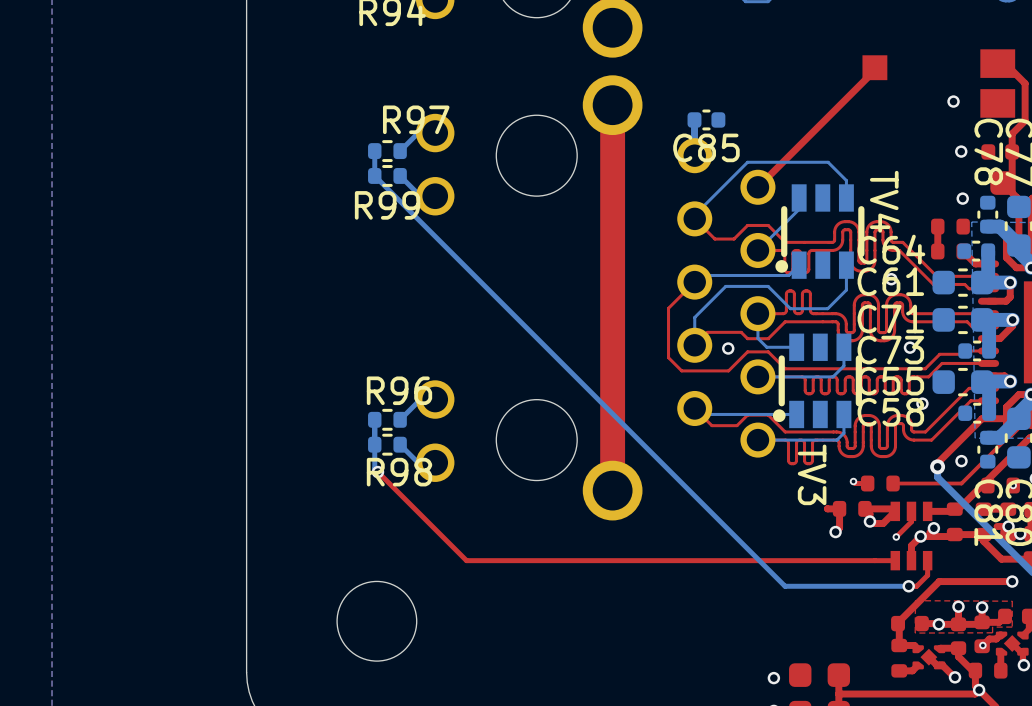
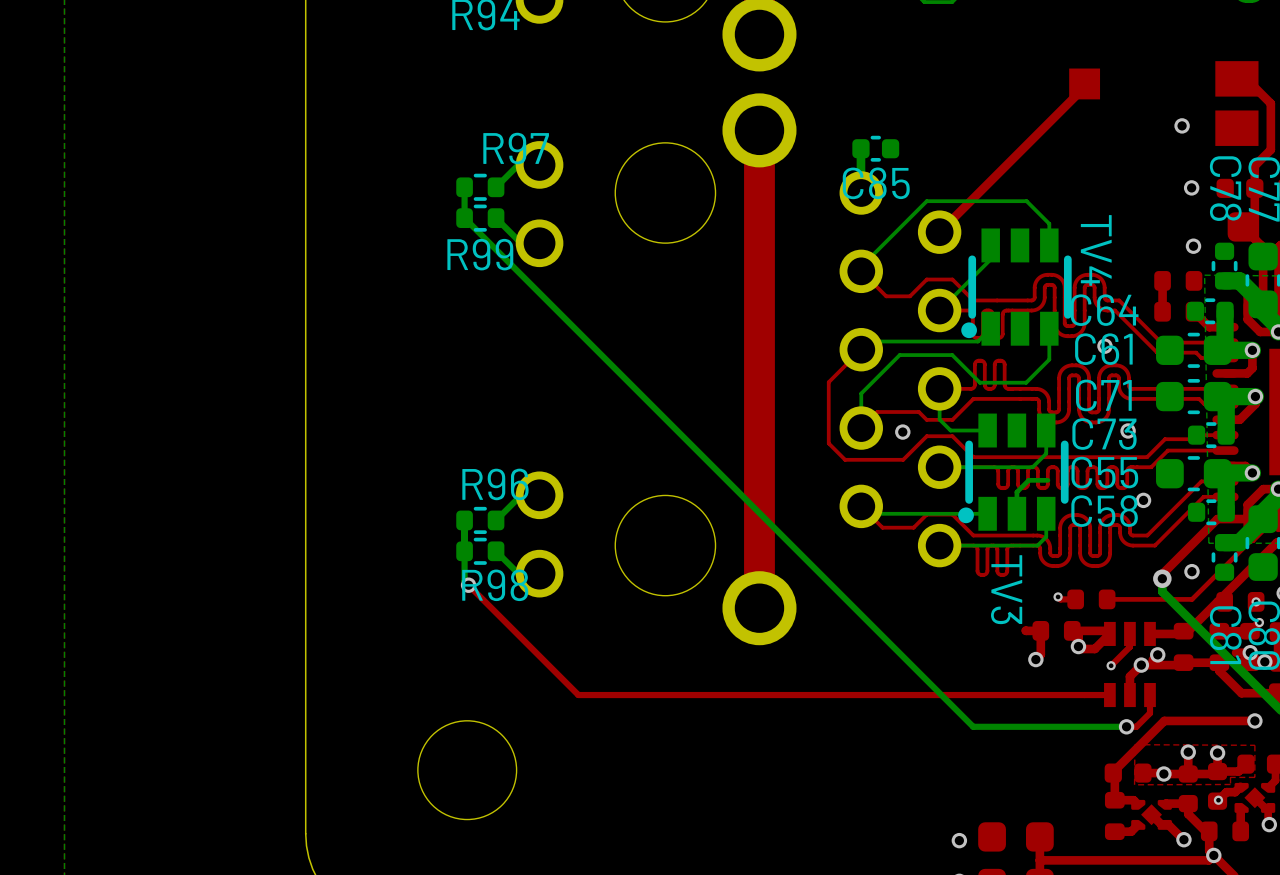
bottom track: none -> (1047, 480) (1028, 480) (1016, 492) (1016, 513)
via: none -> (1259, 622)

